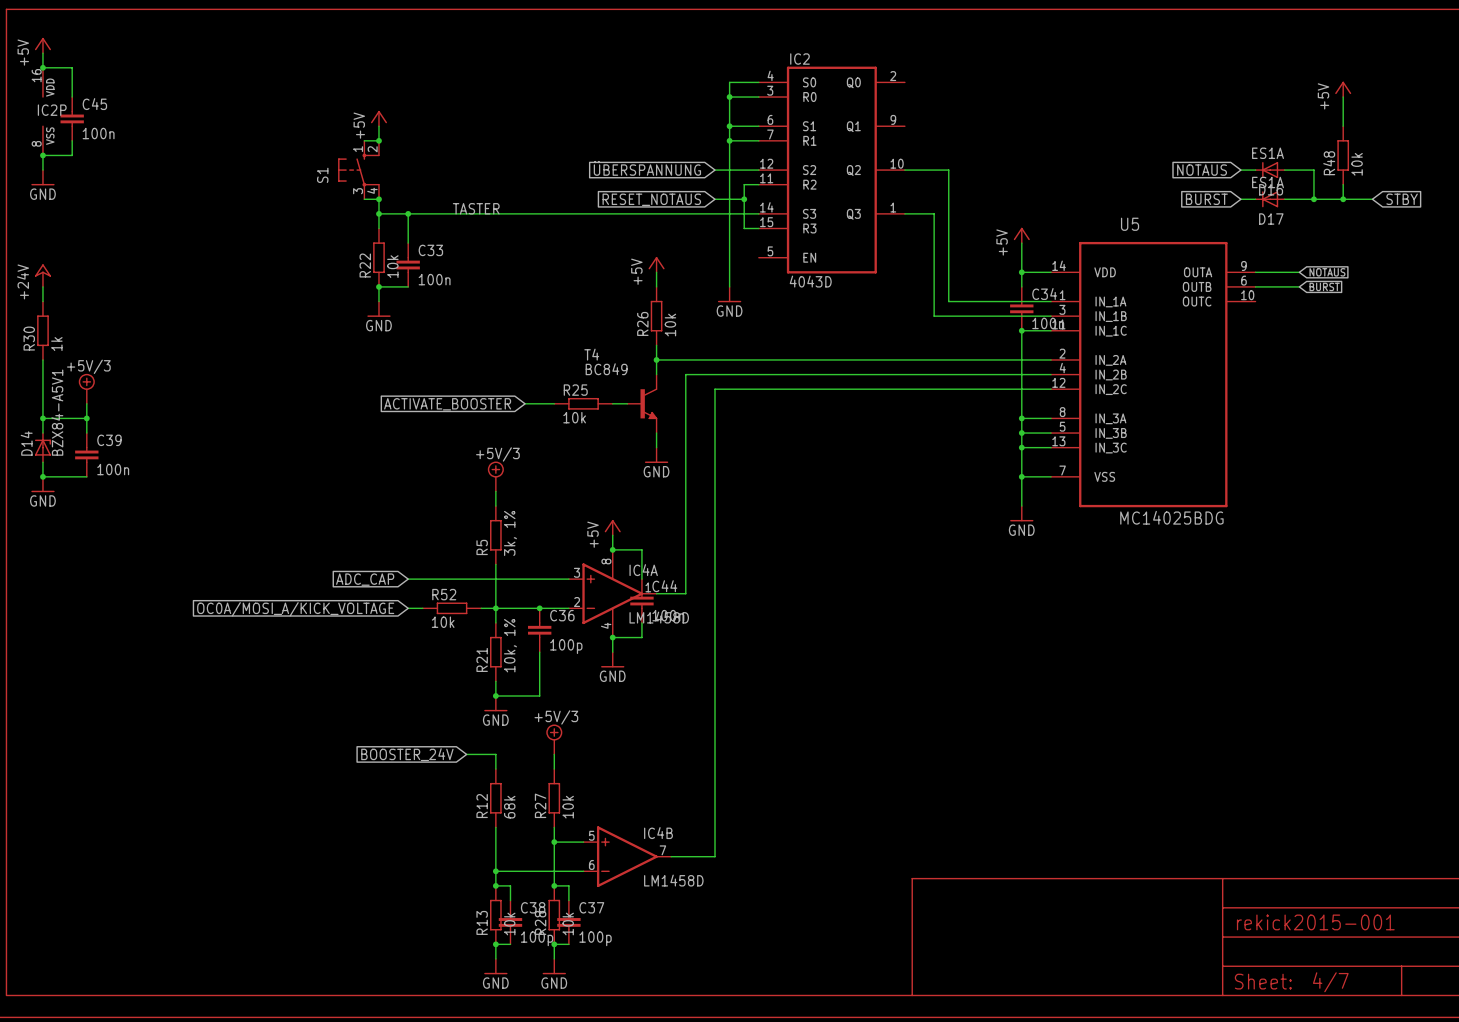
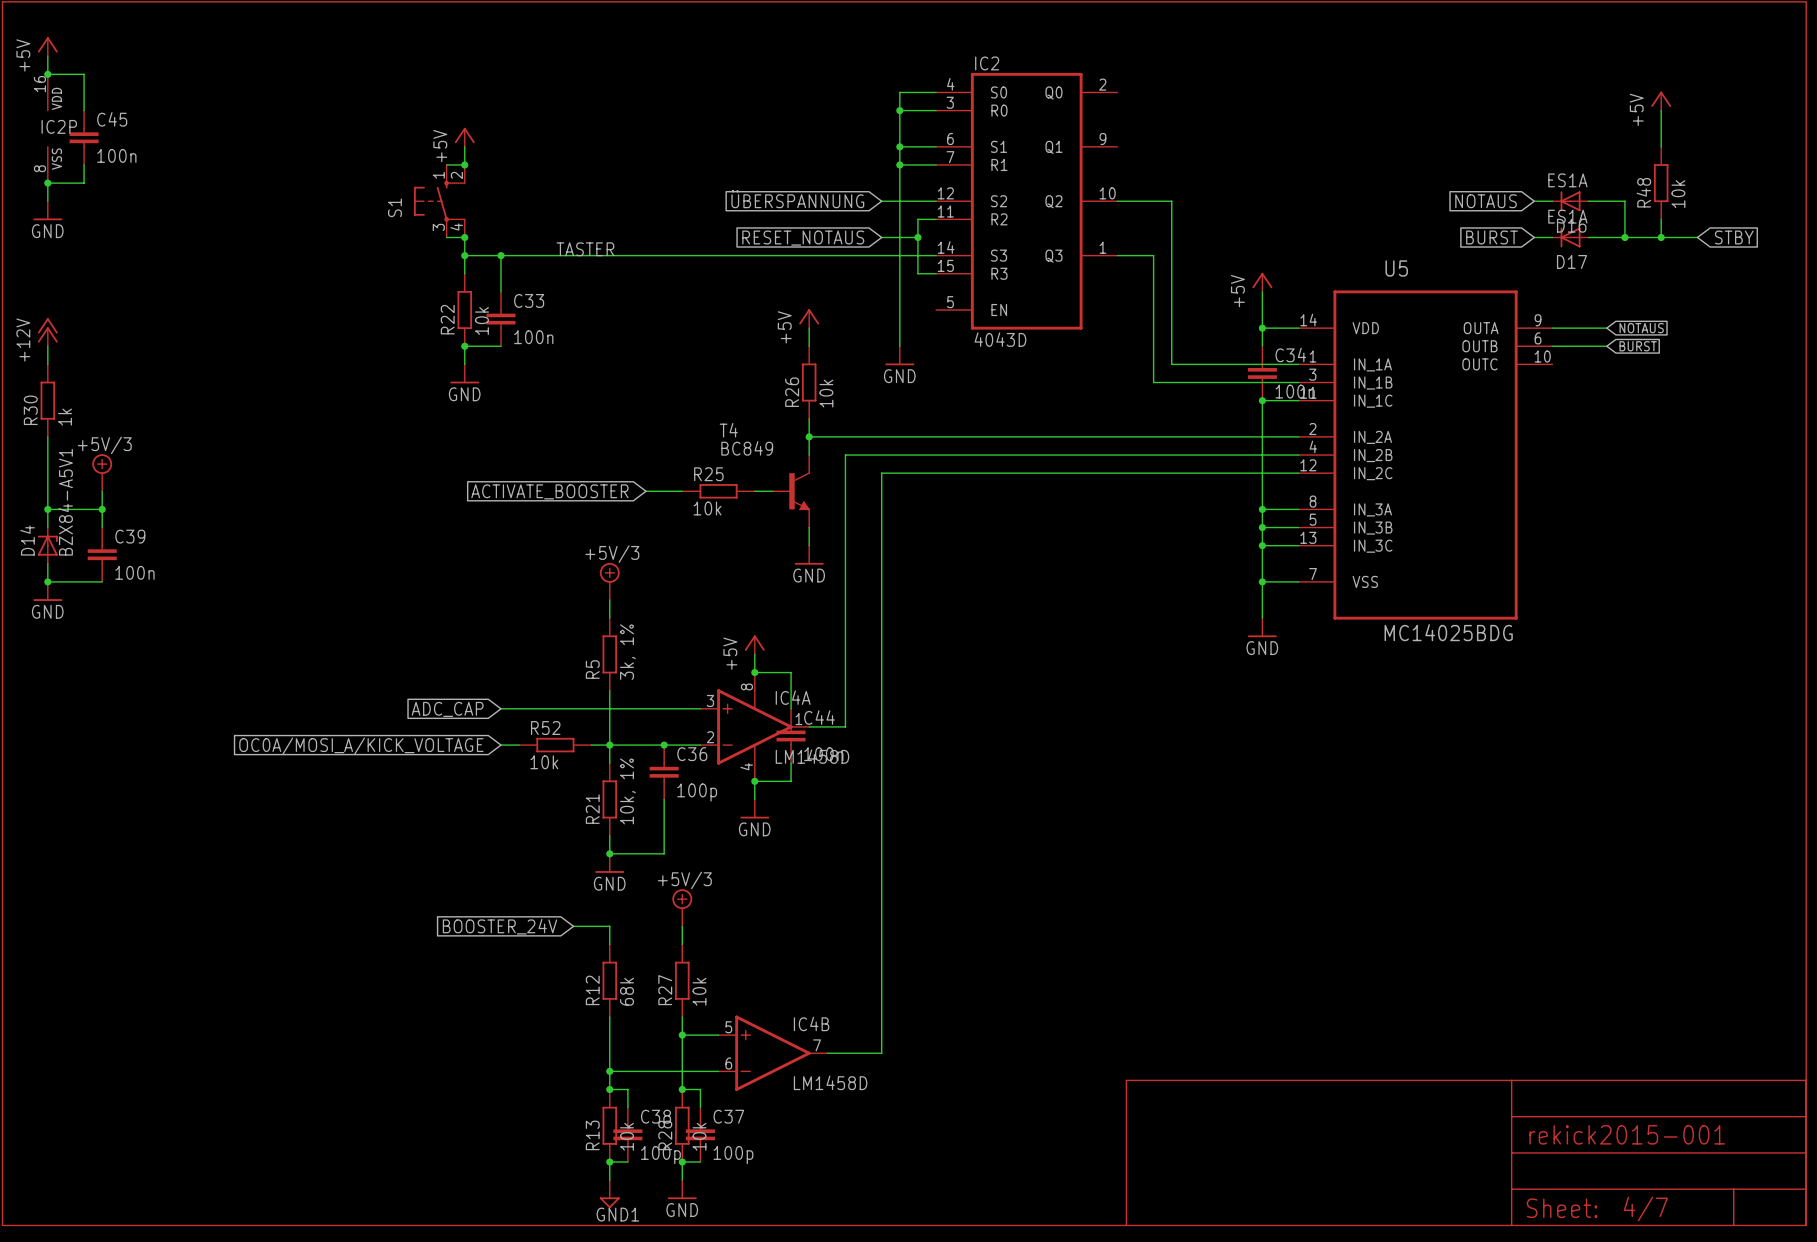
power symbol: +24V (42, 275) -> +12V (47, 332)
power symbol: GND (495, 966) -> GND1 (609, 1194)

